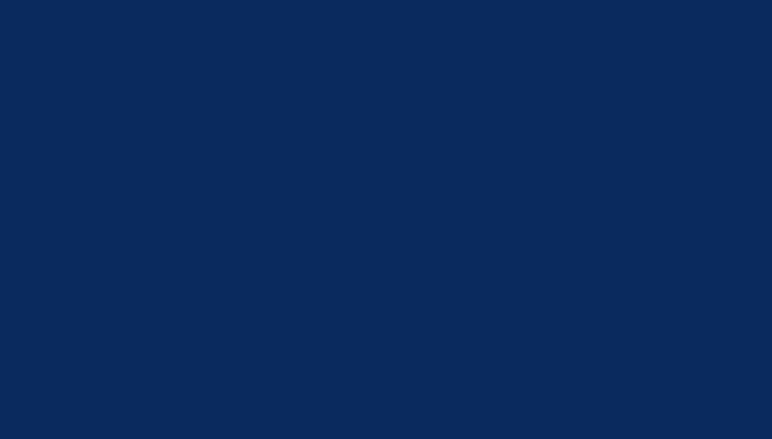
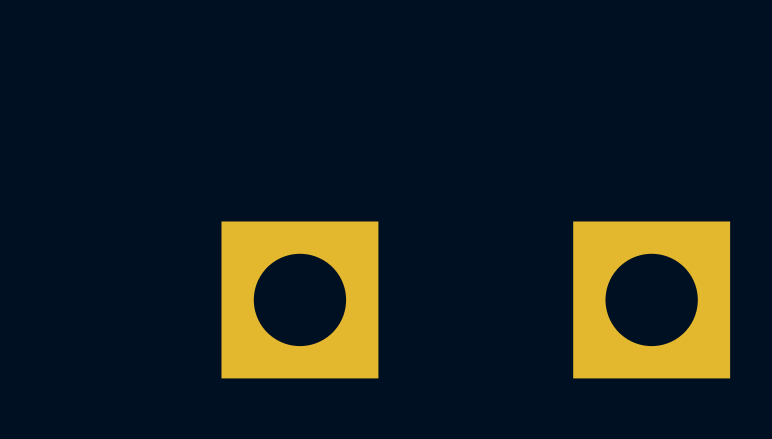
part: none -> (299, 299)
part: none -> (651, 299)

